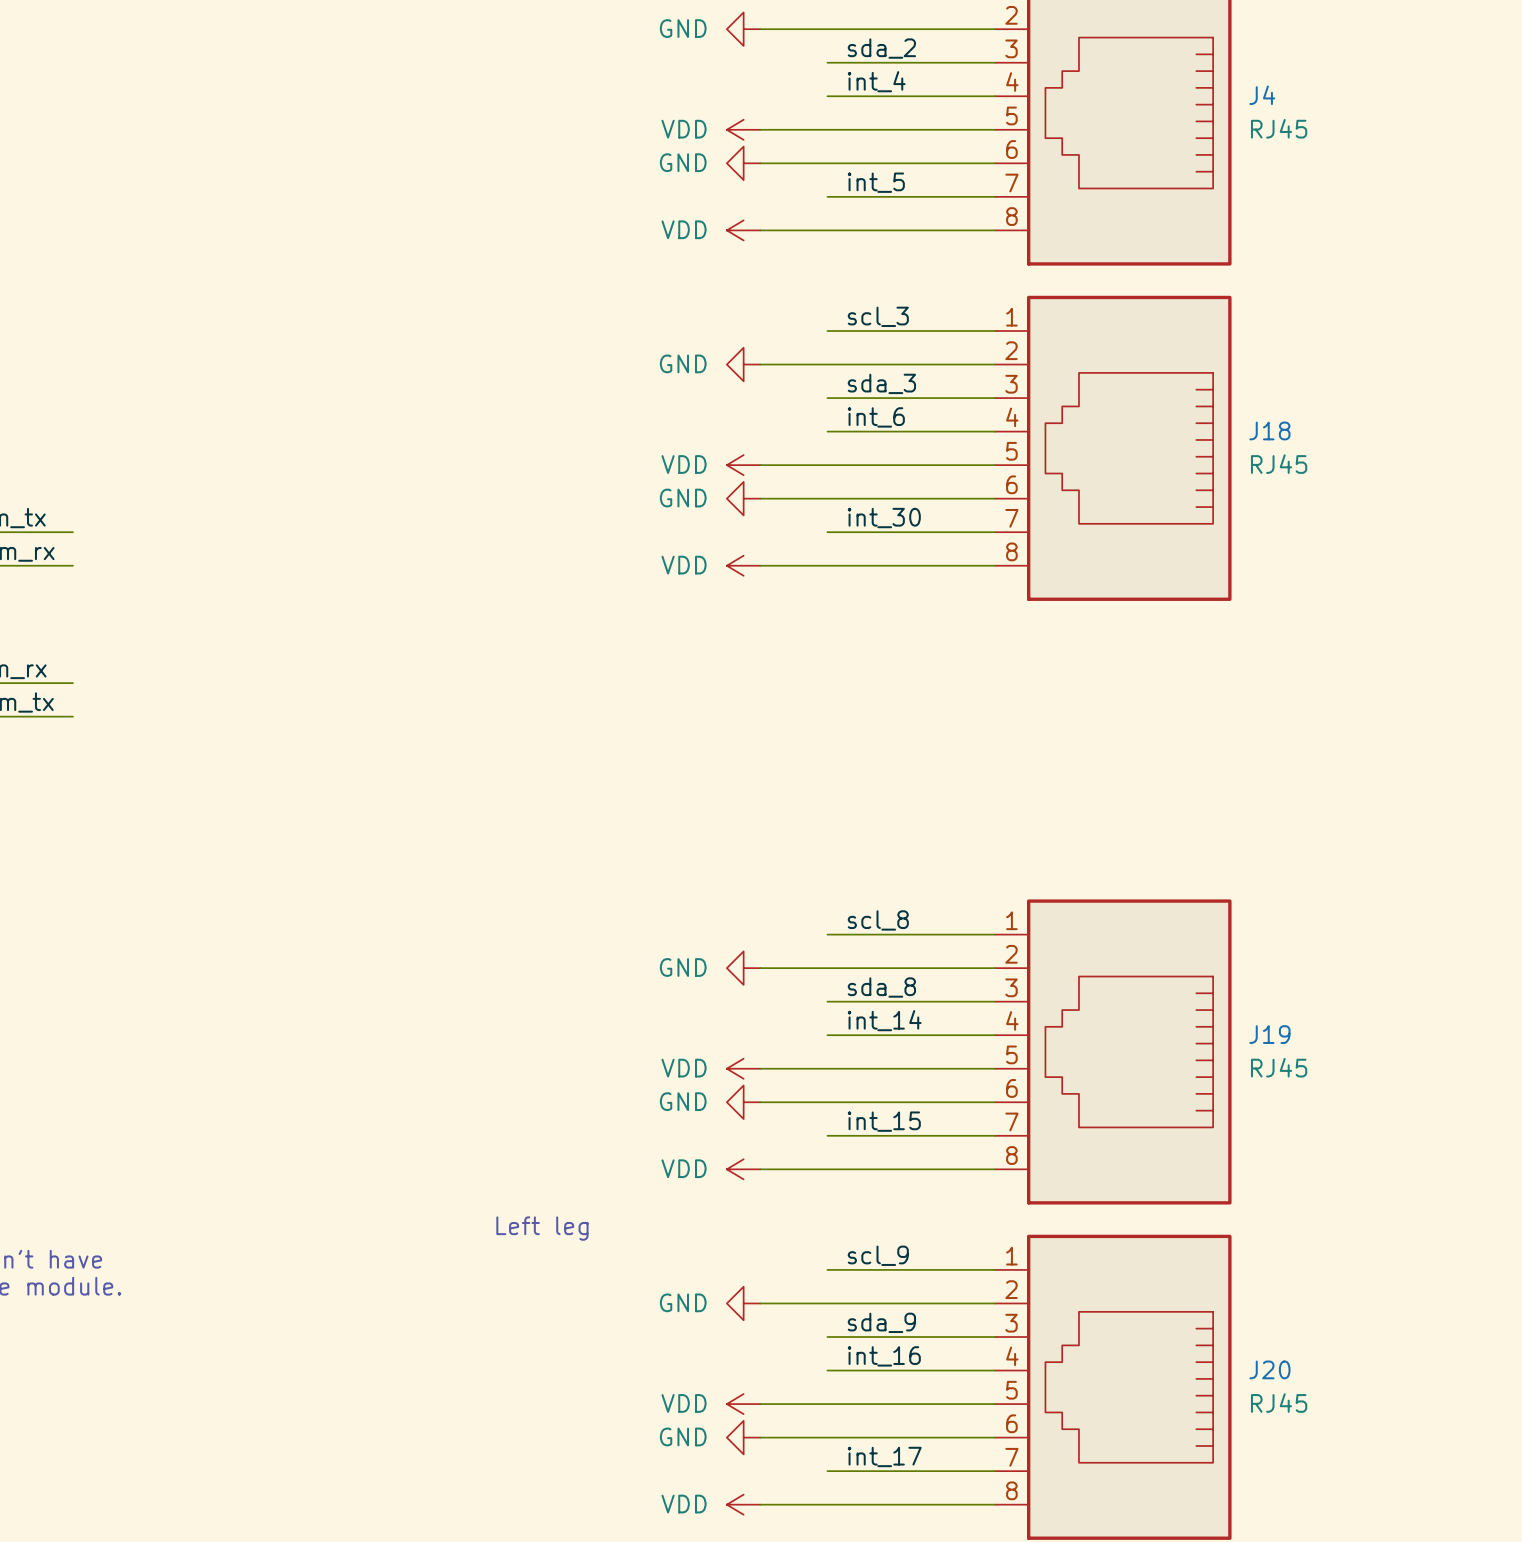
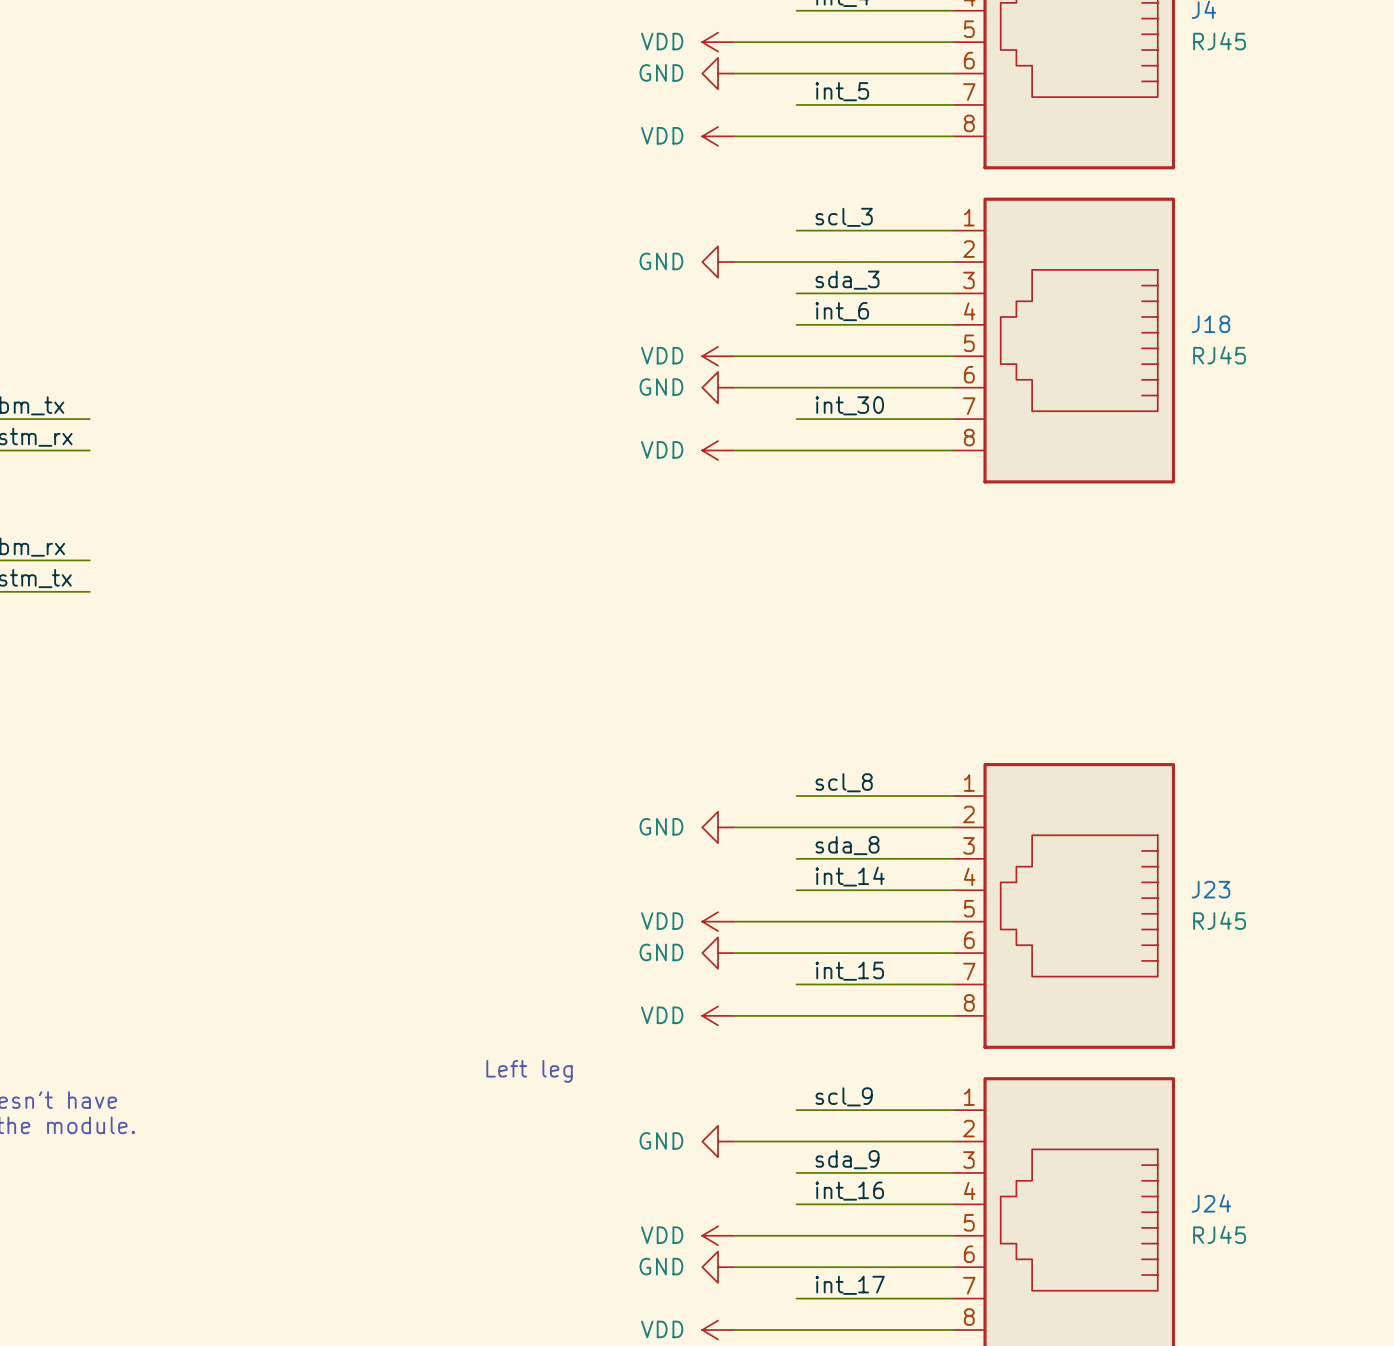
J19 name: J19 (1269, 1034) -> J23 (1210, 889)
J20 name: J20 (1269, 1369) -> J24 (1211, 1203)

